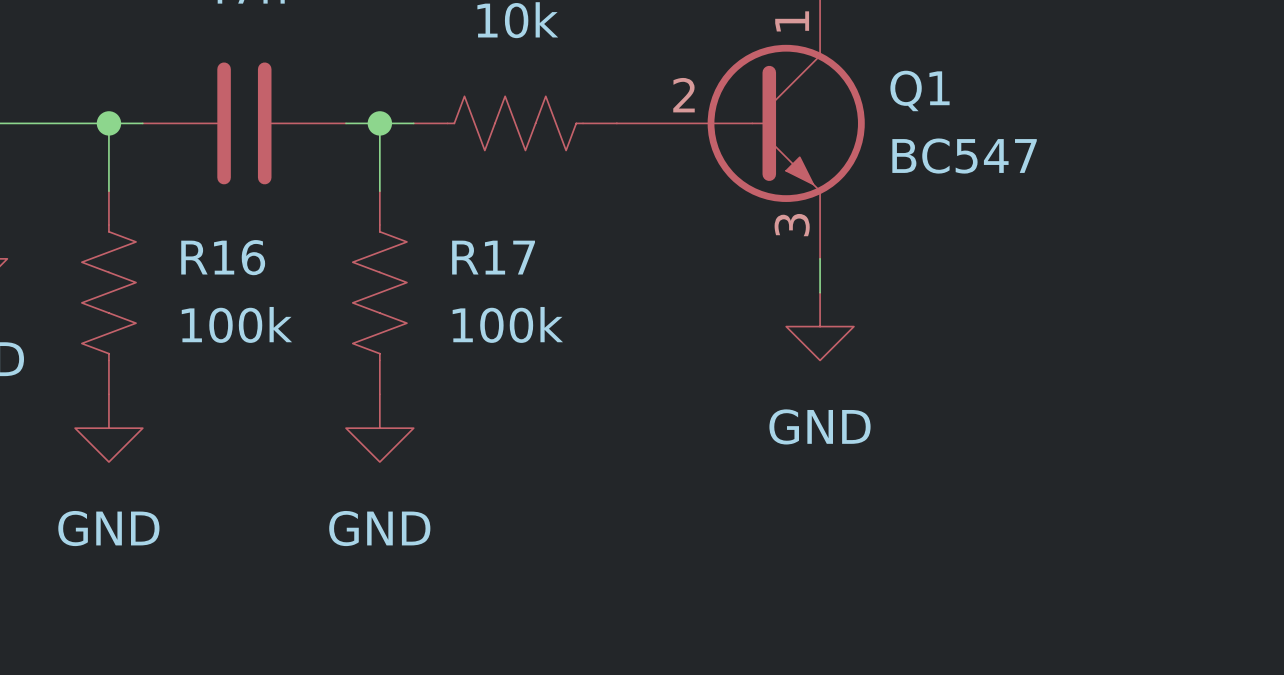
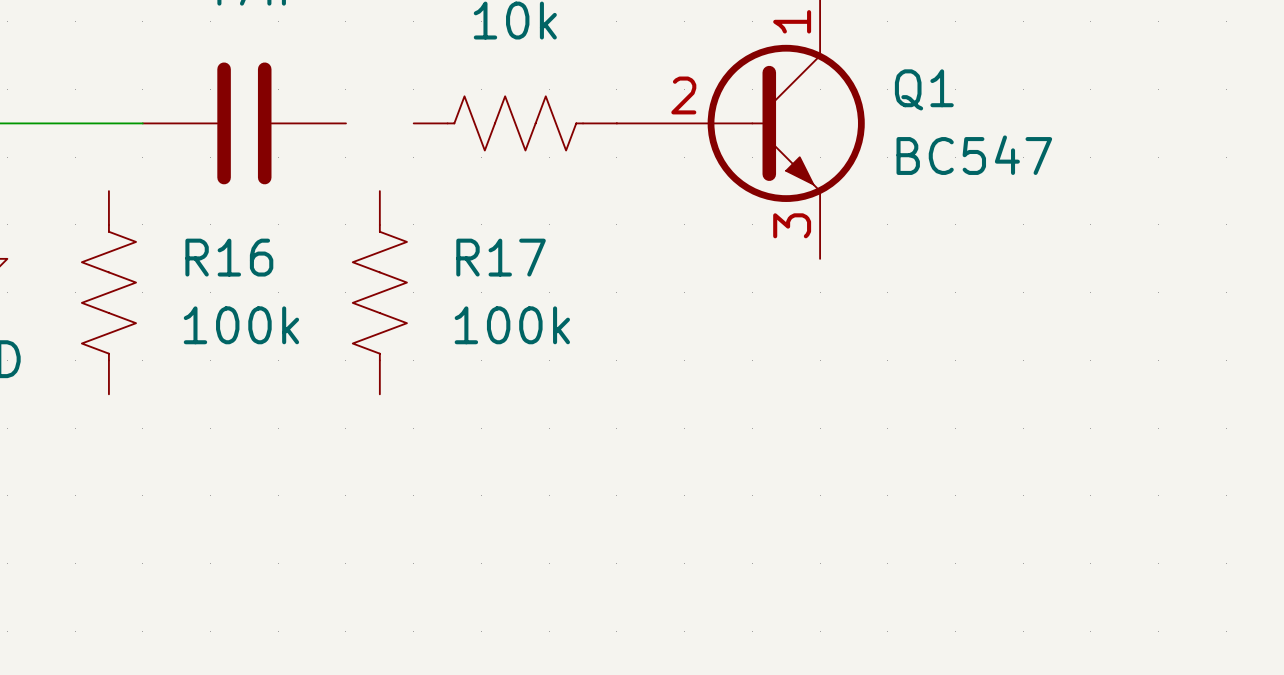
wire: (108, 123) (108, 191) -> none
junction: (108, 123) -> none
wire: (345, 123) (413, 123) -> none
wire: (379, 123) (379, 191) -> none
junction: (379, 123) -> none
wire: (820, 258) (820, 292) -> none
power symbol: GND (820, 326) -> none
power symbol: GND (108, 428) -> none
power symbol: GND (379, 428) -> none

